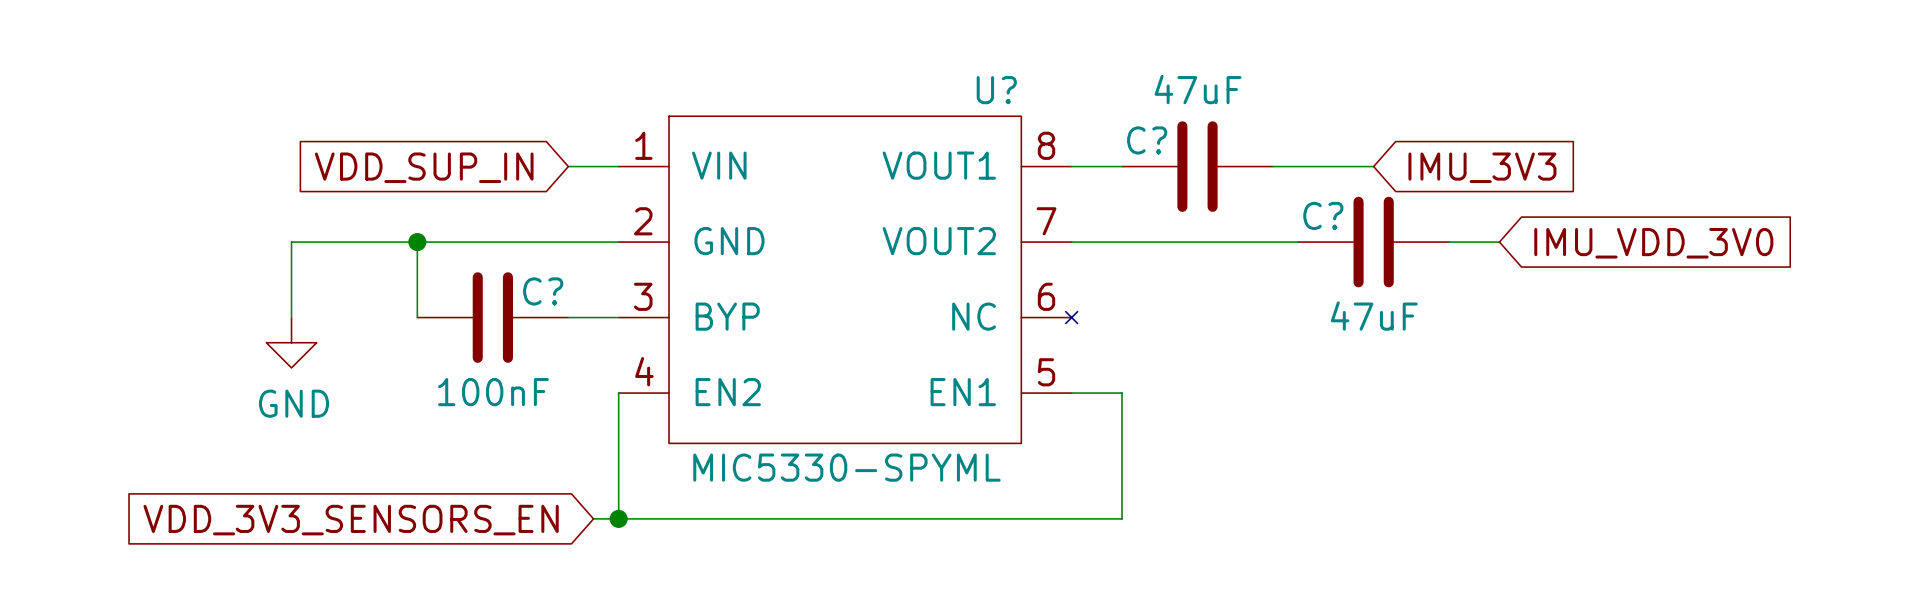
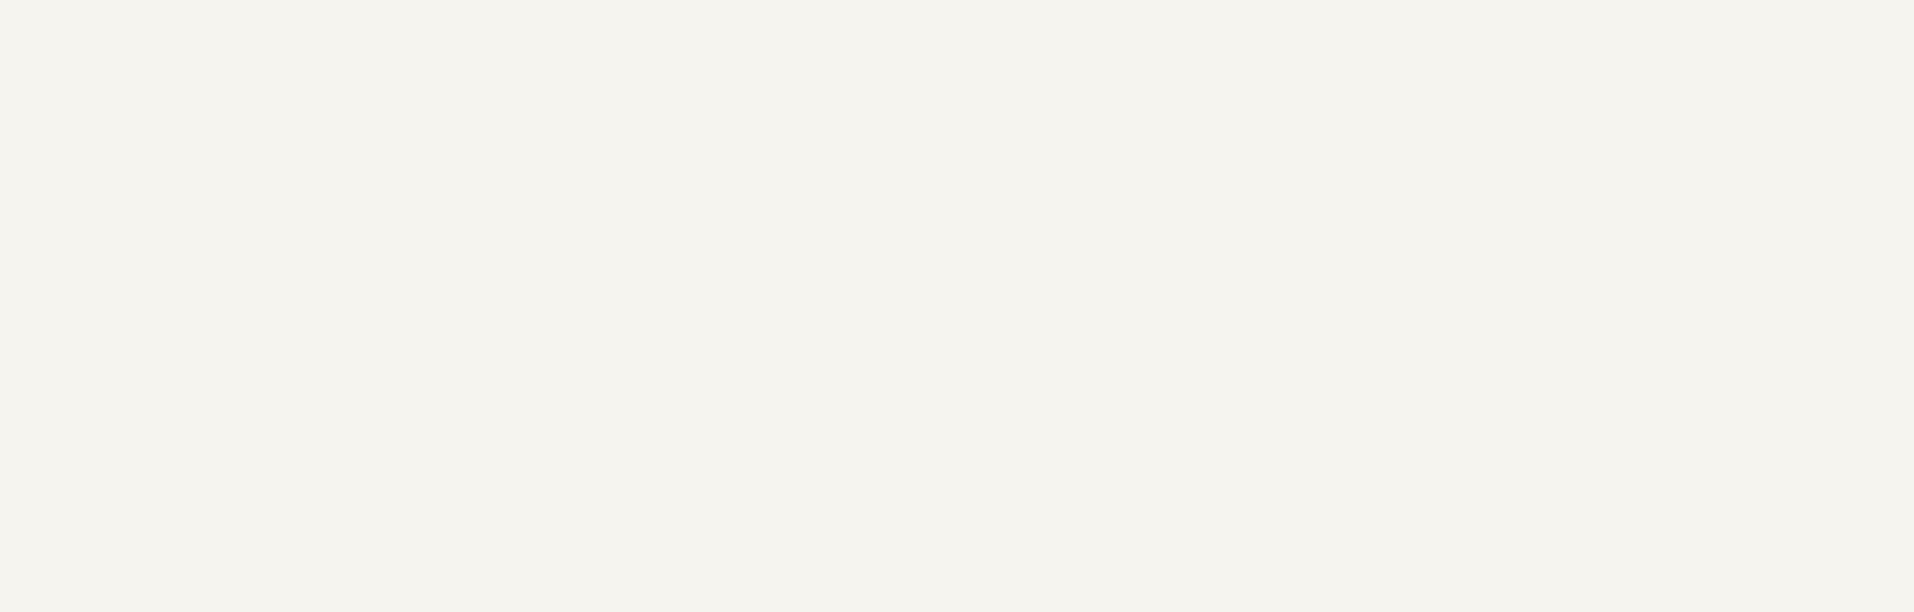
wire: (568, 166) (618, 166) -> none
wire: (1071, 166) (1122, 166) -> none
C?: 47uF (1197, 166) -> none
wire: (1272, 166) (1373, 166) -> none
global label: VDD_SUP_IN (424, 167) -> none
global label: IMU_3V3 (1482, 167) -> none
wire: (417, 242) (417, 317) -> none
junction: (417, 242) -> none
wire: (618, 242) (291, 242) (291, 317) -> none
wire: (1071, 242) (1298, 242) -> none
C?: 47uF (1373, 242) -> none
wire: (1449, 242) (1499, 242) -> none
global label: IMU_VDD_3V0 (1653, 243) -> none
U?: MIC5330-SPYML (848, 279) -> none
C?: 100nF (492, 317) -> none
wire: (568, 317) (618, 317) -> none
power symbol: GND (291, 342) -> none
wire: (618, 393) (618, 518) -> none
wire: (1071, 393) (1122, 393) (1122, 518) (593, 518) -> none
junction: (618, 518) -> none
global label: VDD_3V3_SENSORS_EN (351, 520) -> none

